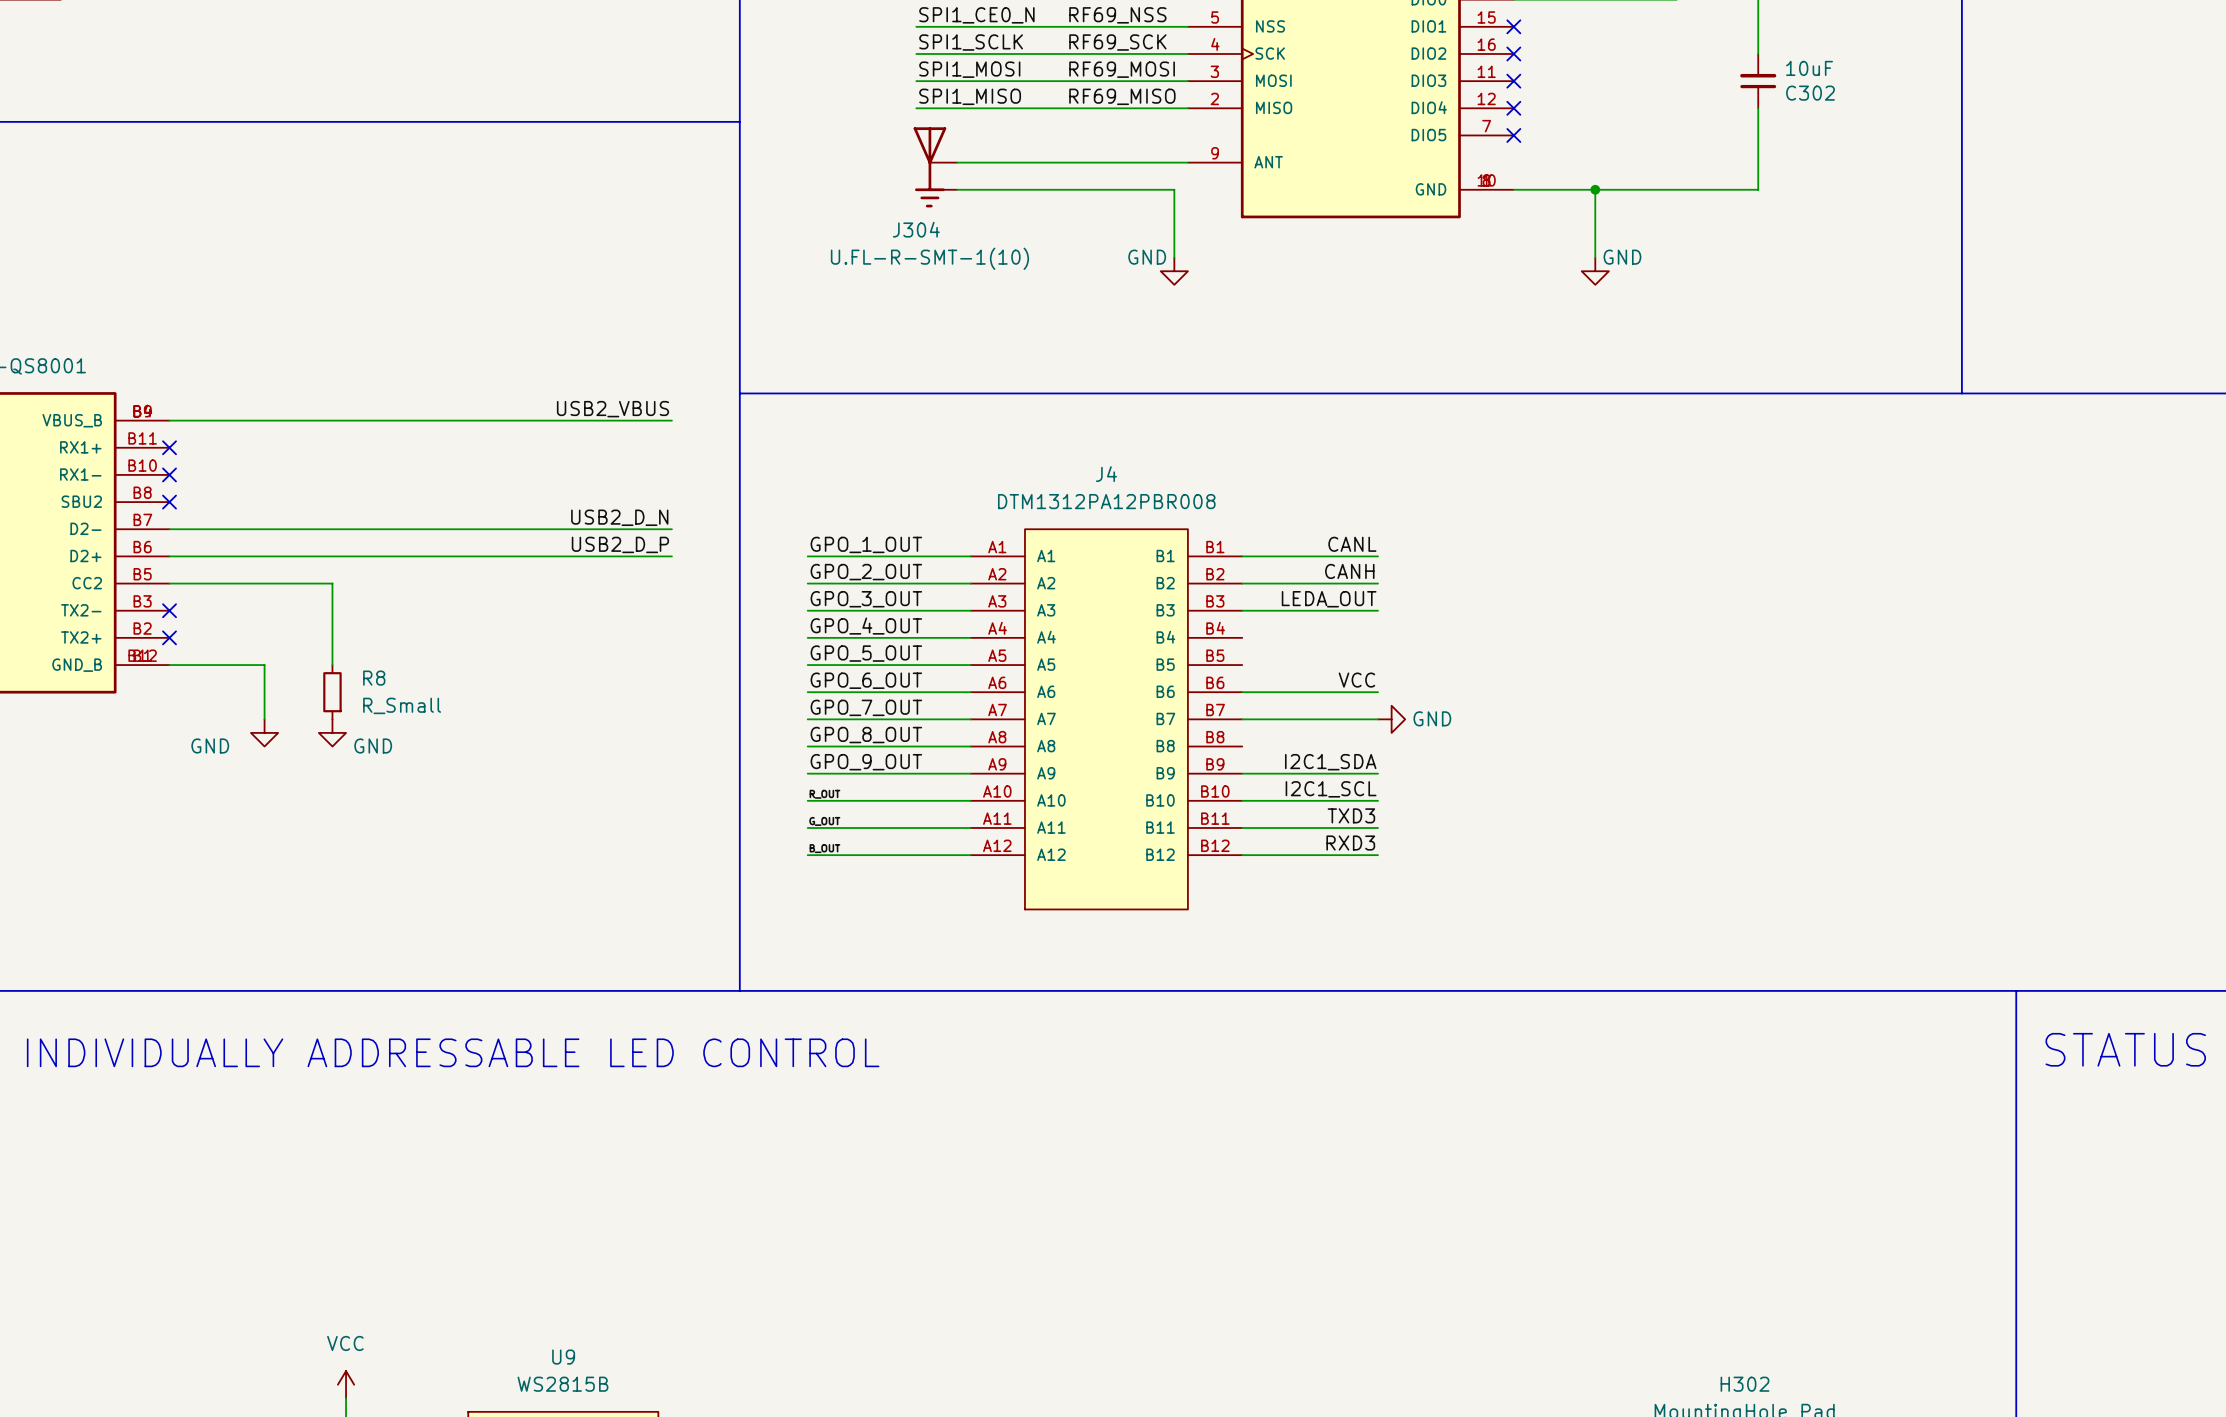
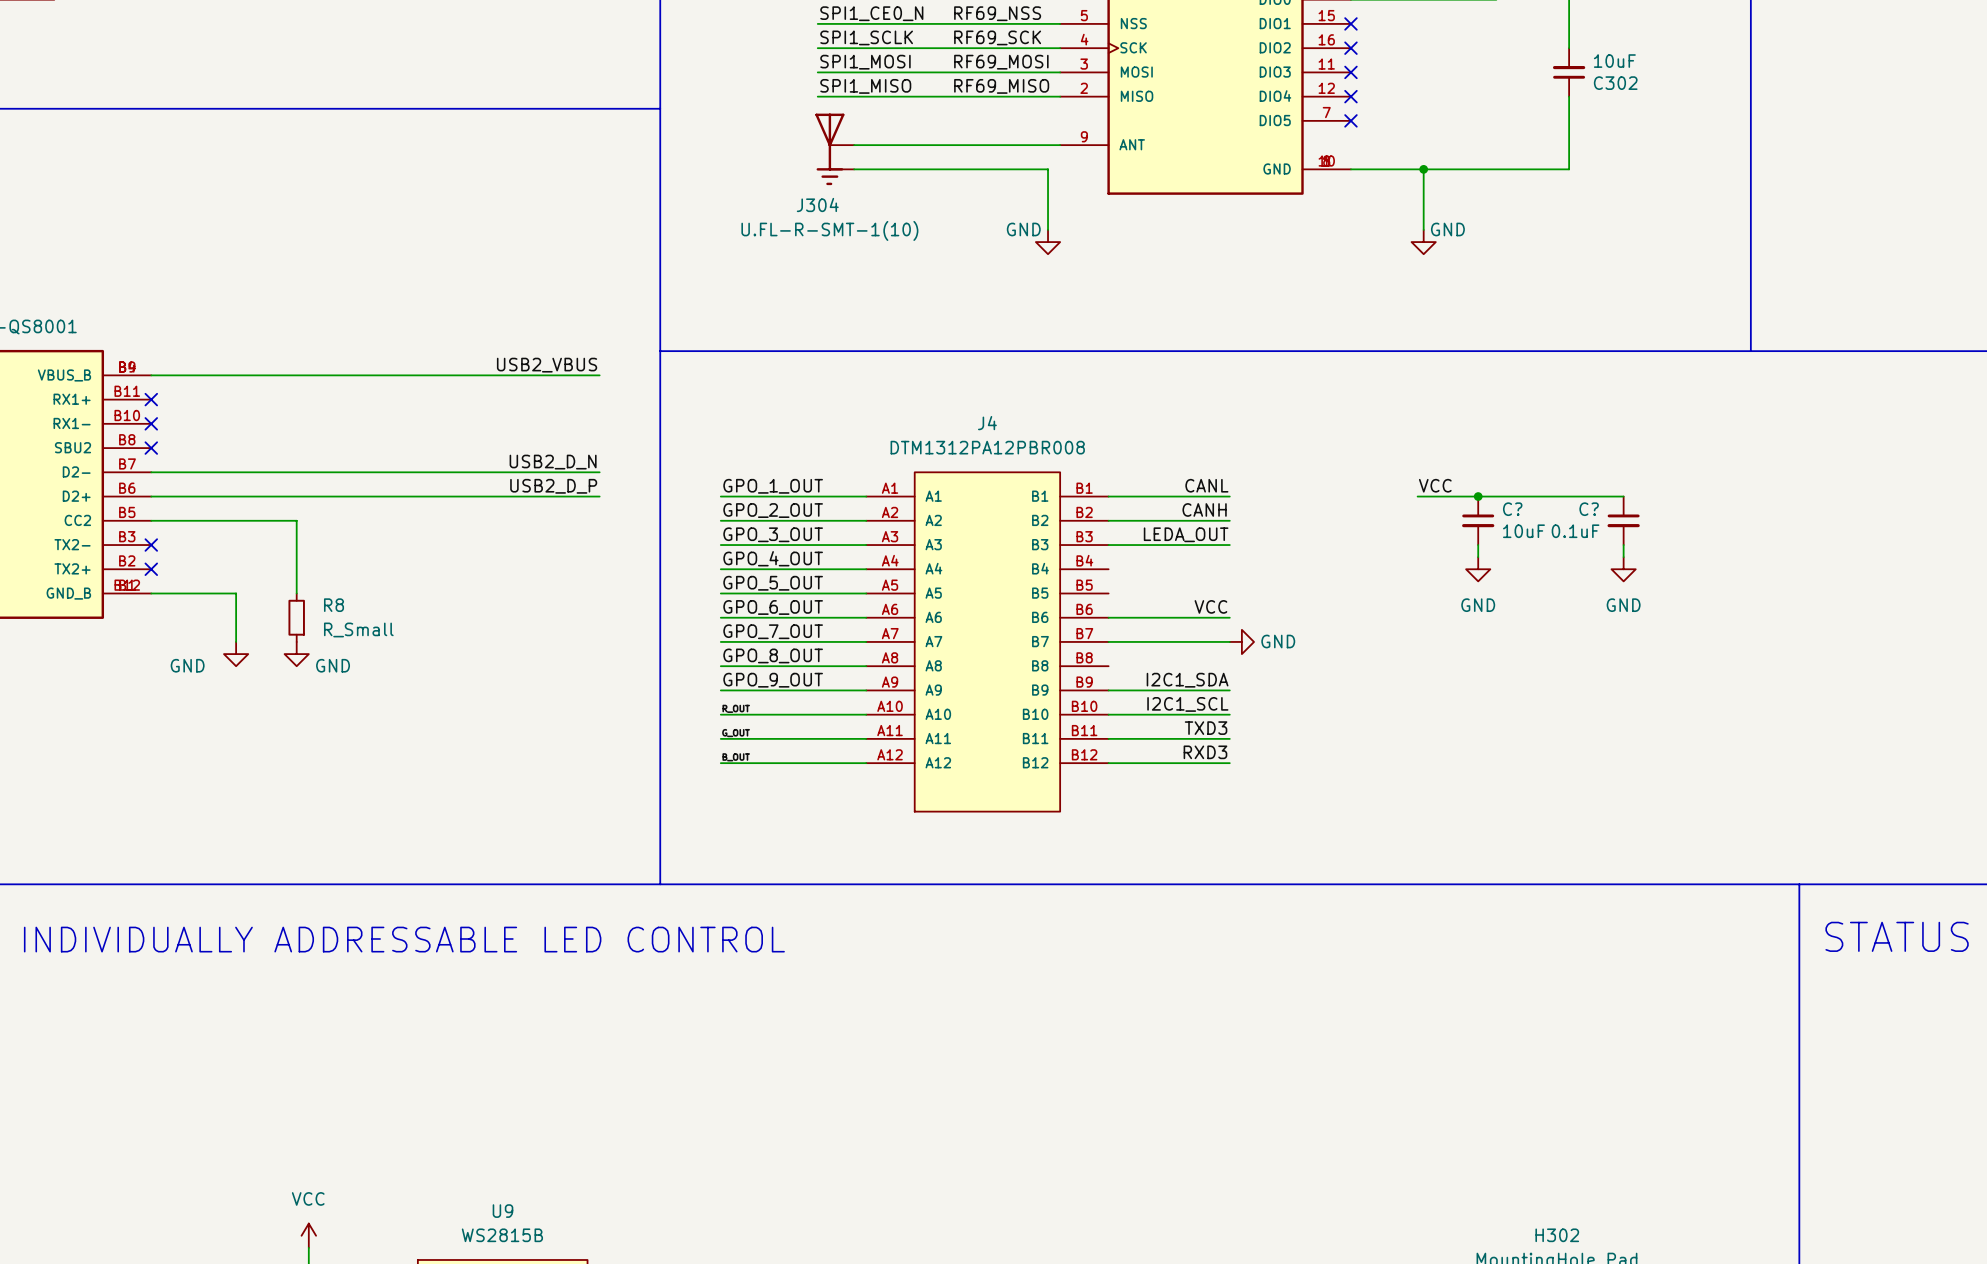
label: none -> VCC (1435, 485)
wire: none -> (1417, 496) (1623, 496)
junction: none -> (1478, 496)
C?: none -> 10uF (1478, 520)
C?: none -> 0.1uF (1623, 520)
wire: none -> (1478, 545) (1478, 557)
wire: none -> (1623, 545) (1623, 557)
power symbol: none -> GND (1478, 569)
power symbol: none -> GND (1623, 569)

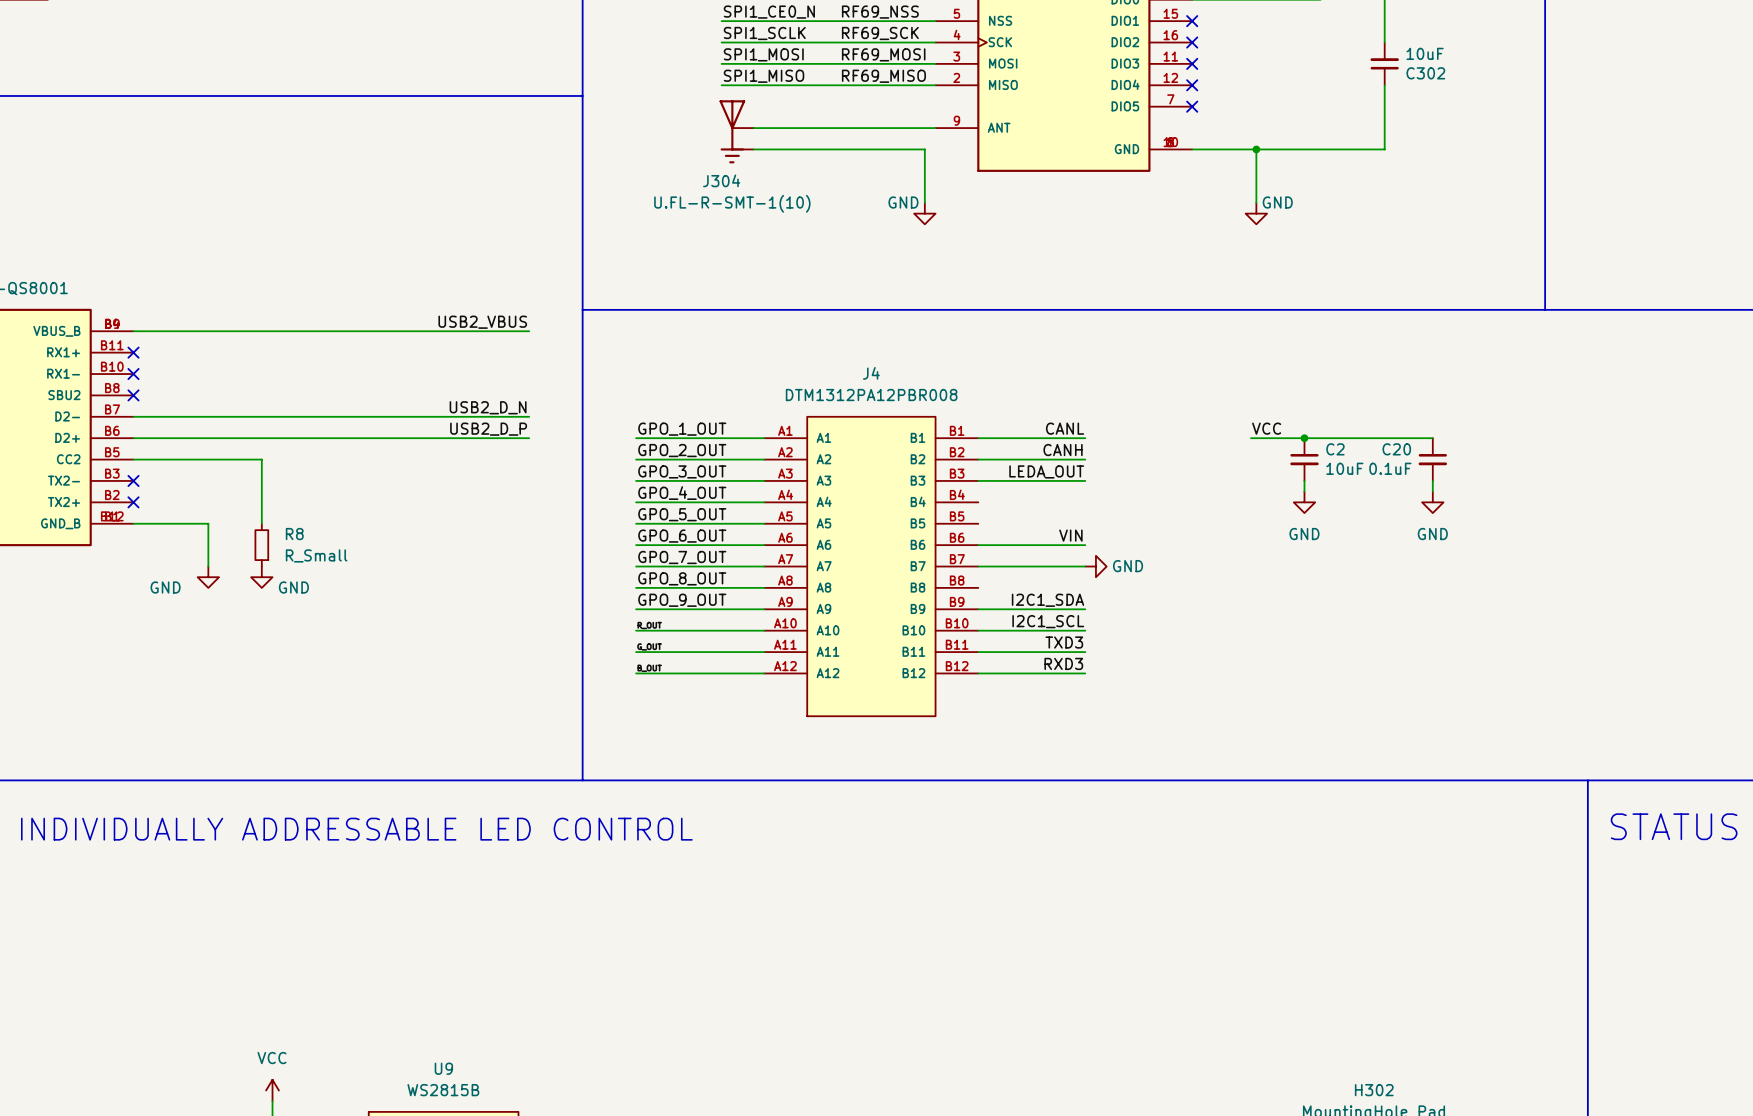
C? name: C? (1512, 509) -> C2 (1335, 449)
C? name: C? (1589, 509) -> C20 (1396, 449)
label: VCC (1210, 606) -> VIN (1070, 535)

